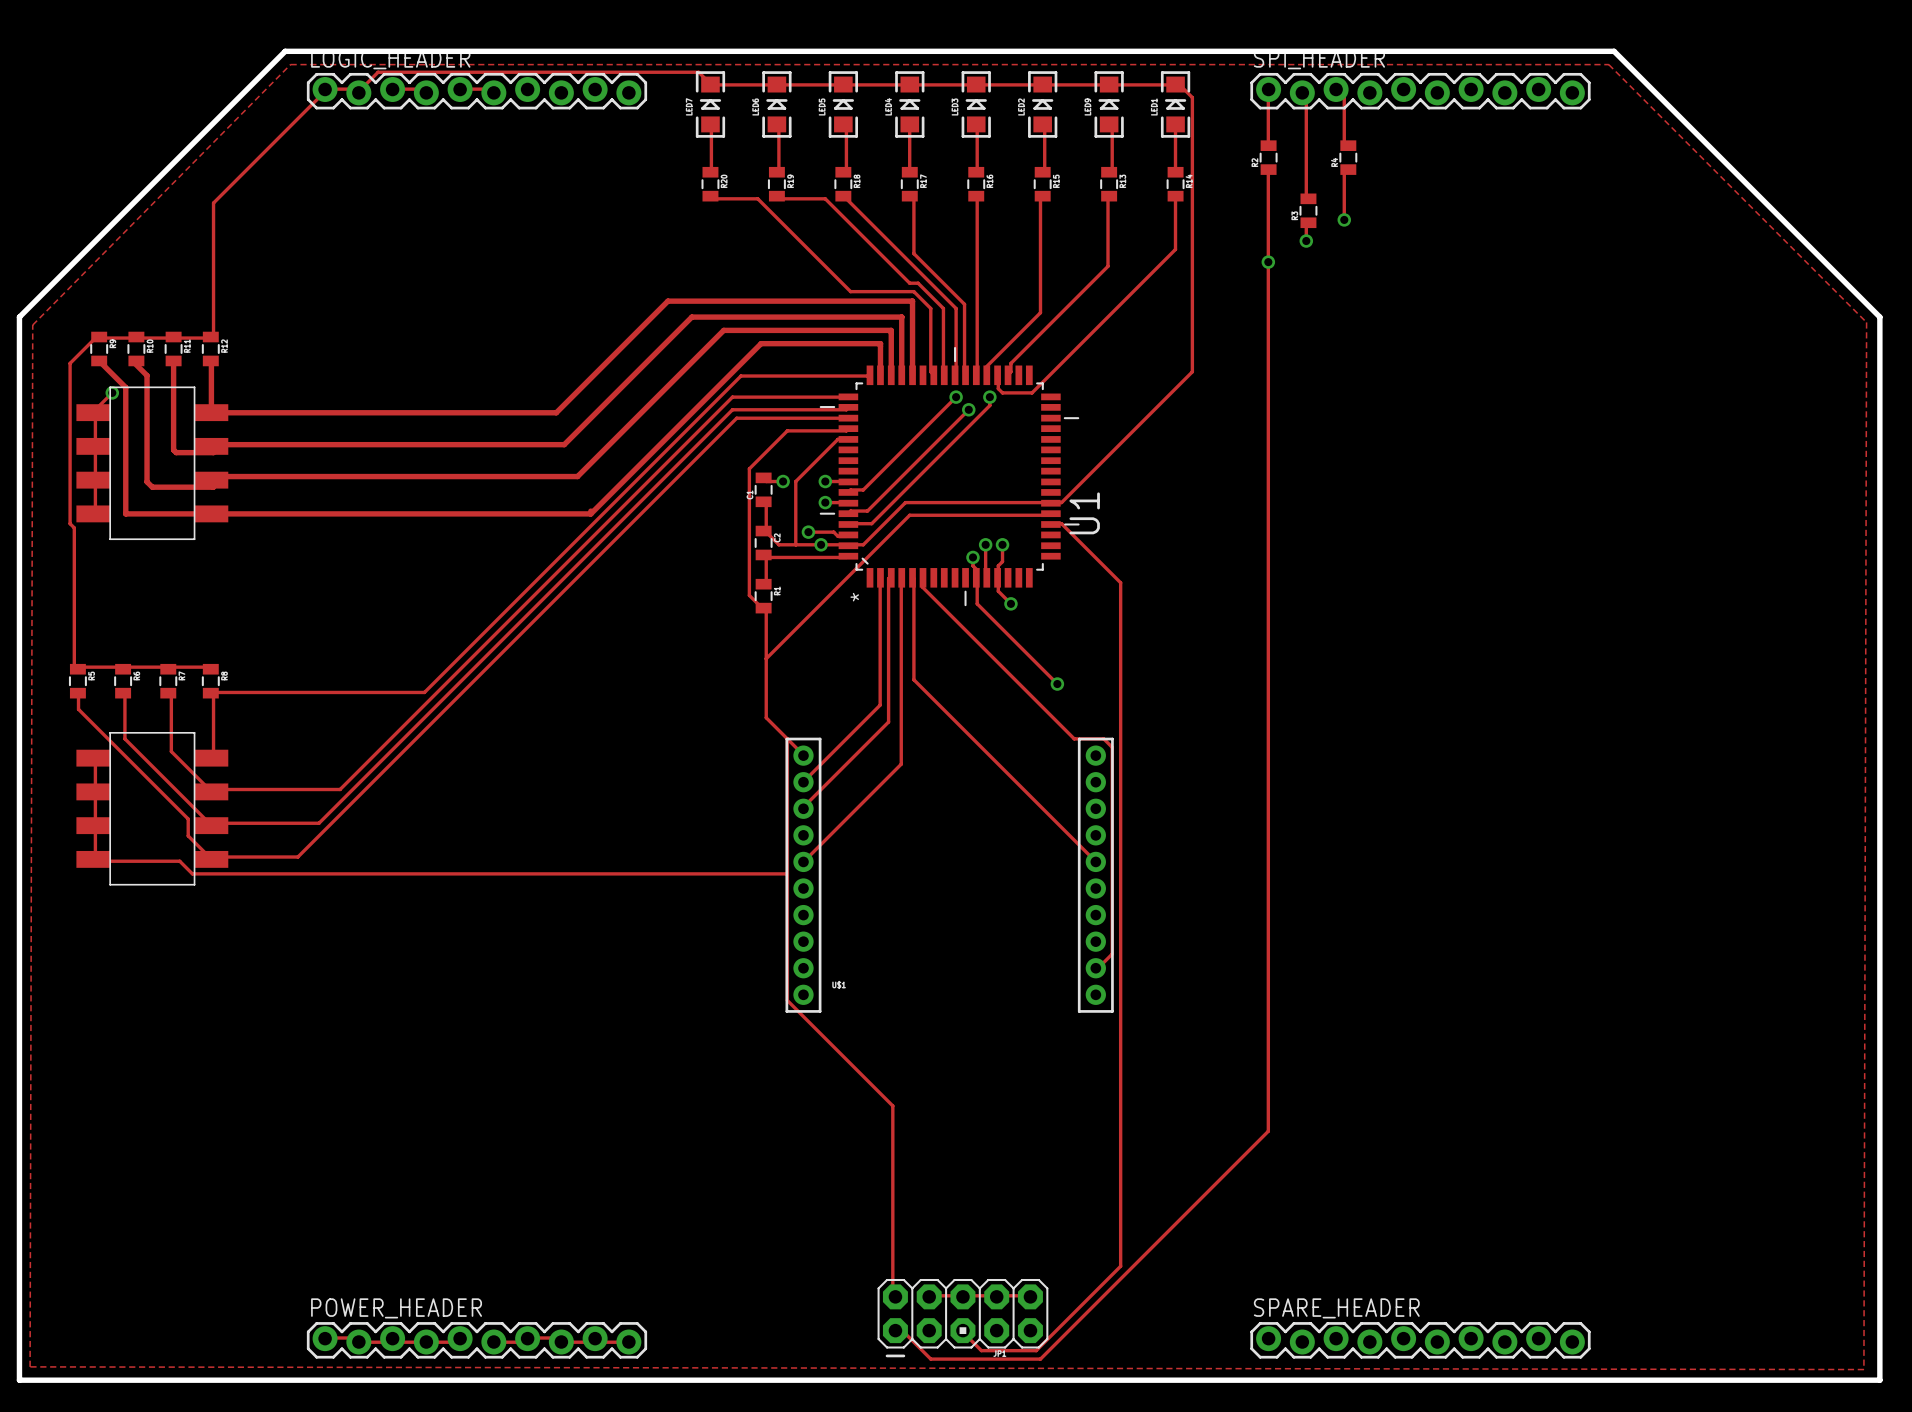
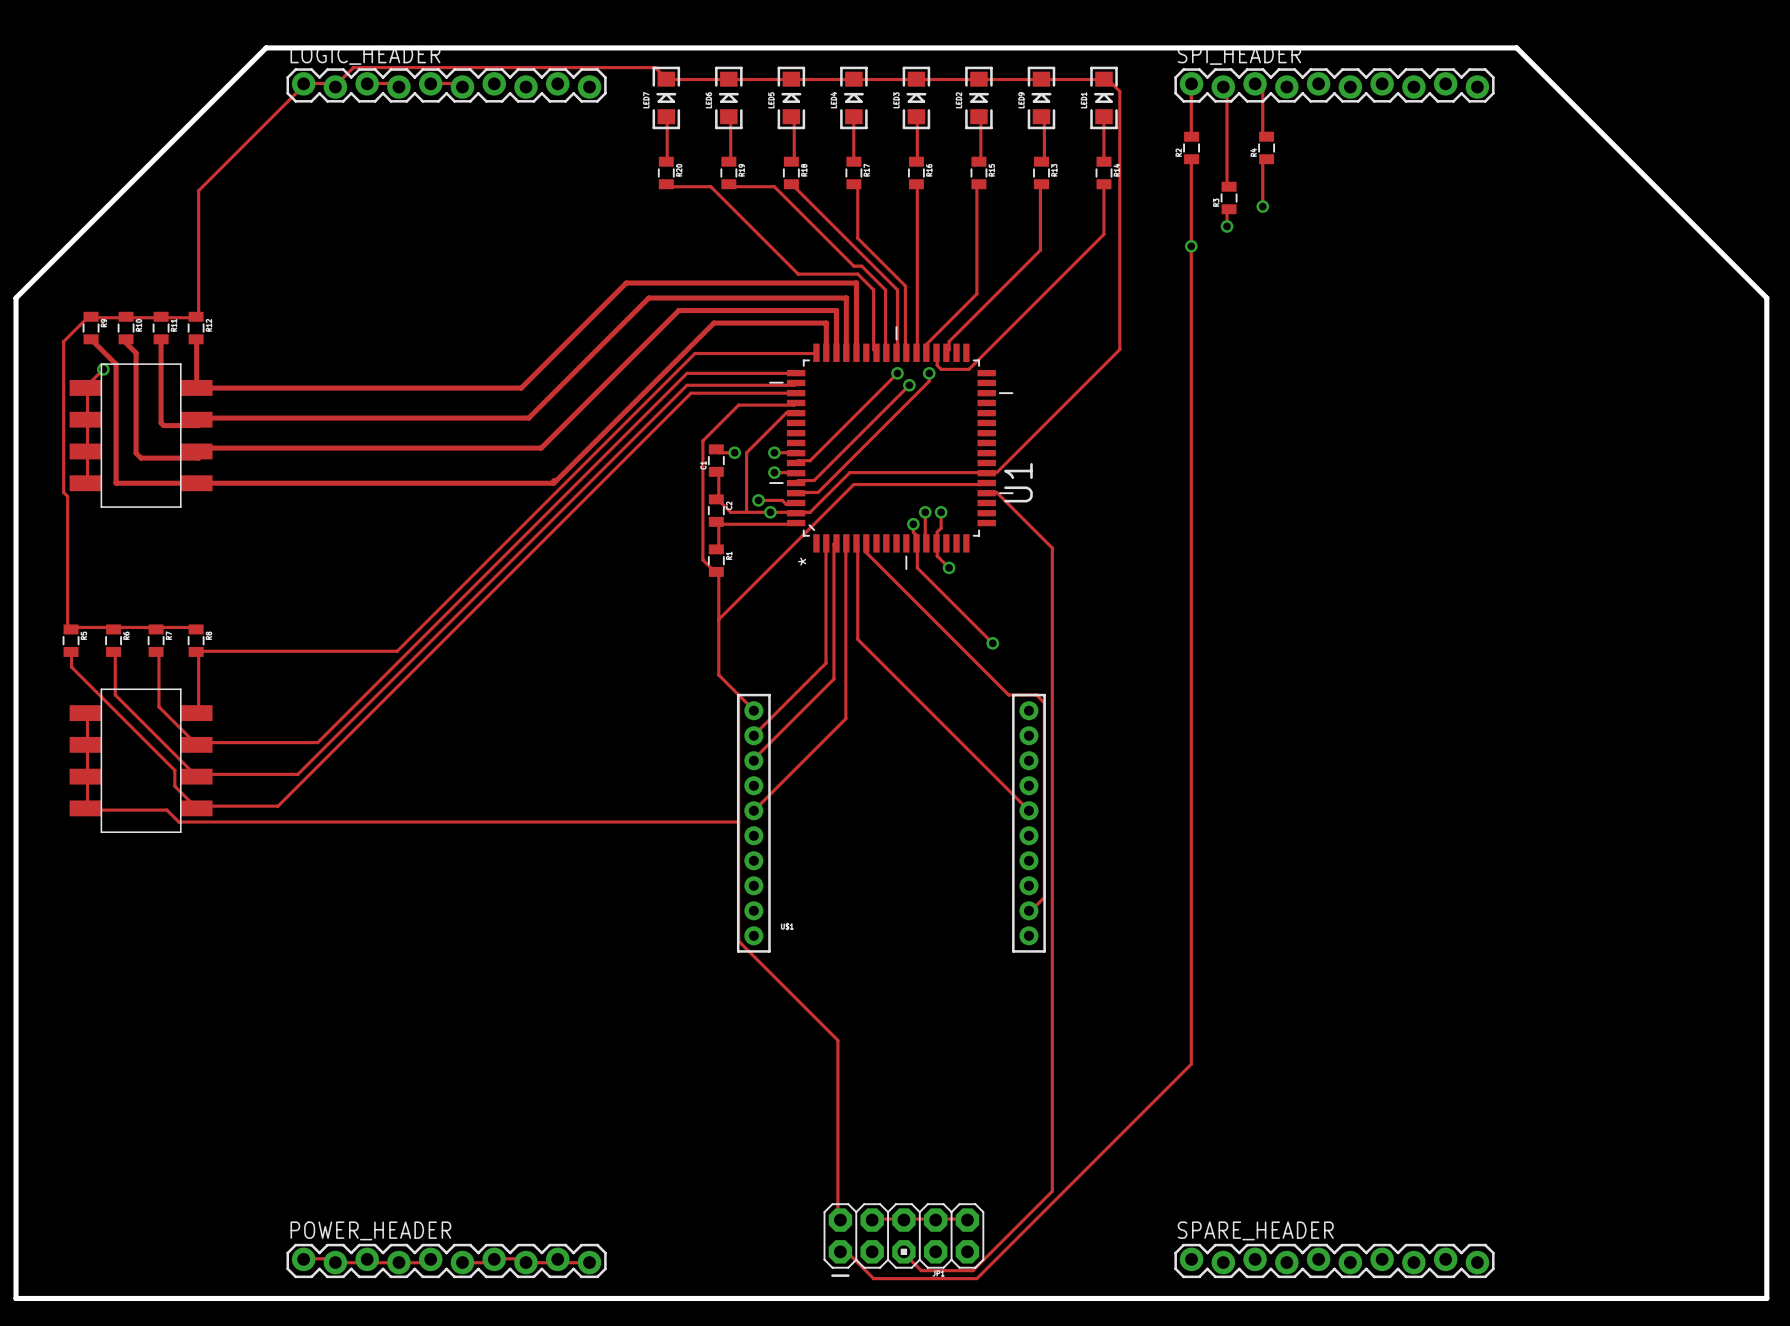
zone outline: (290, 64) (1608, 64) (1866, 322) (1863, 1369) (30, 1366) (32, 325) (290, 64) -> none

